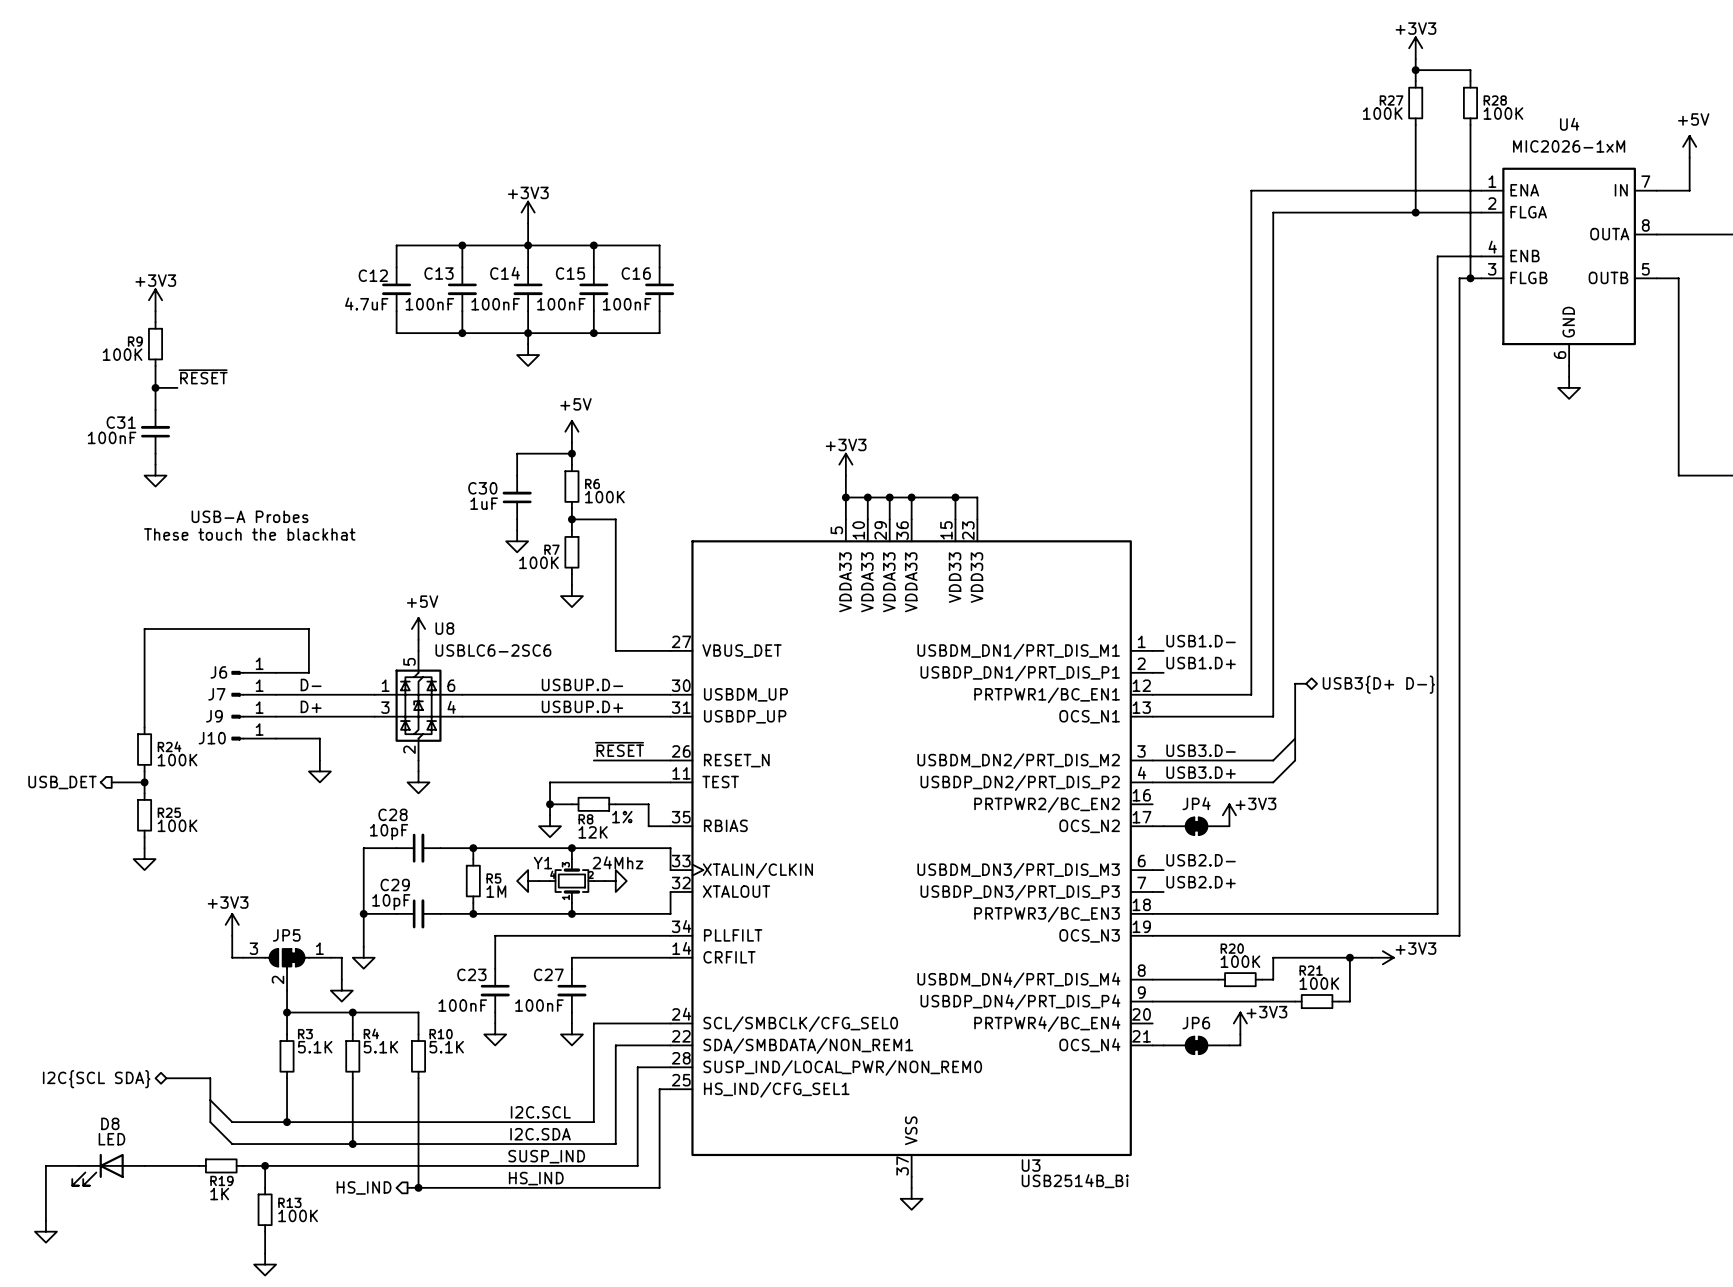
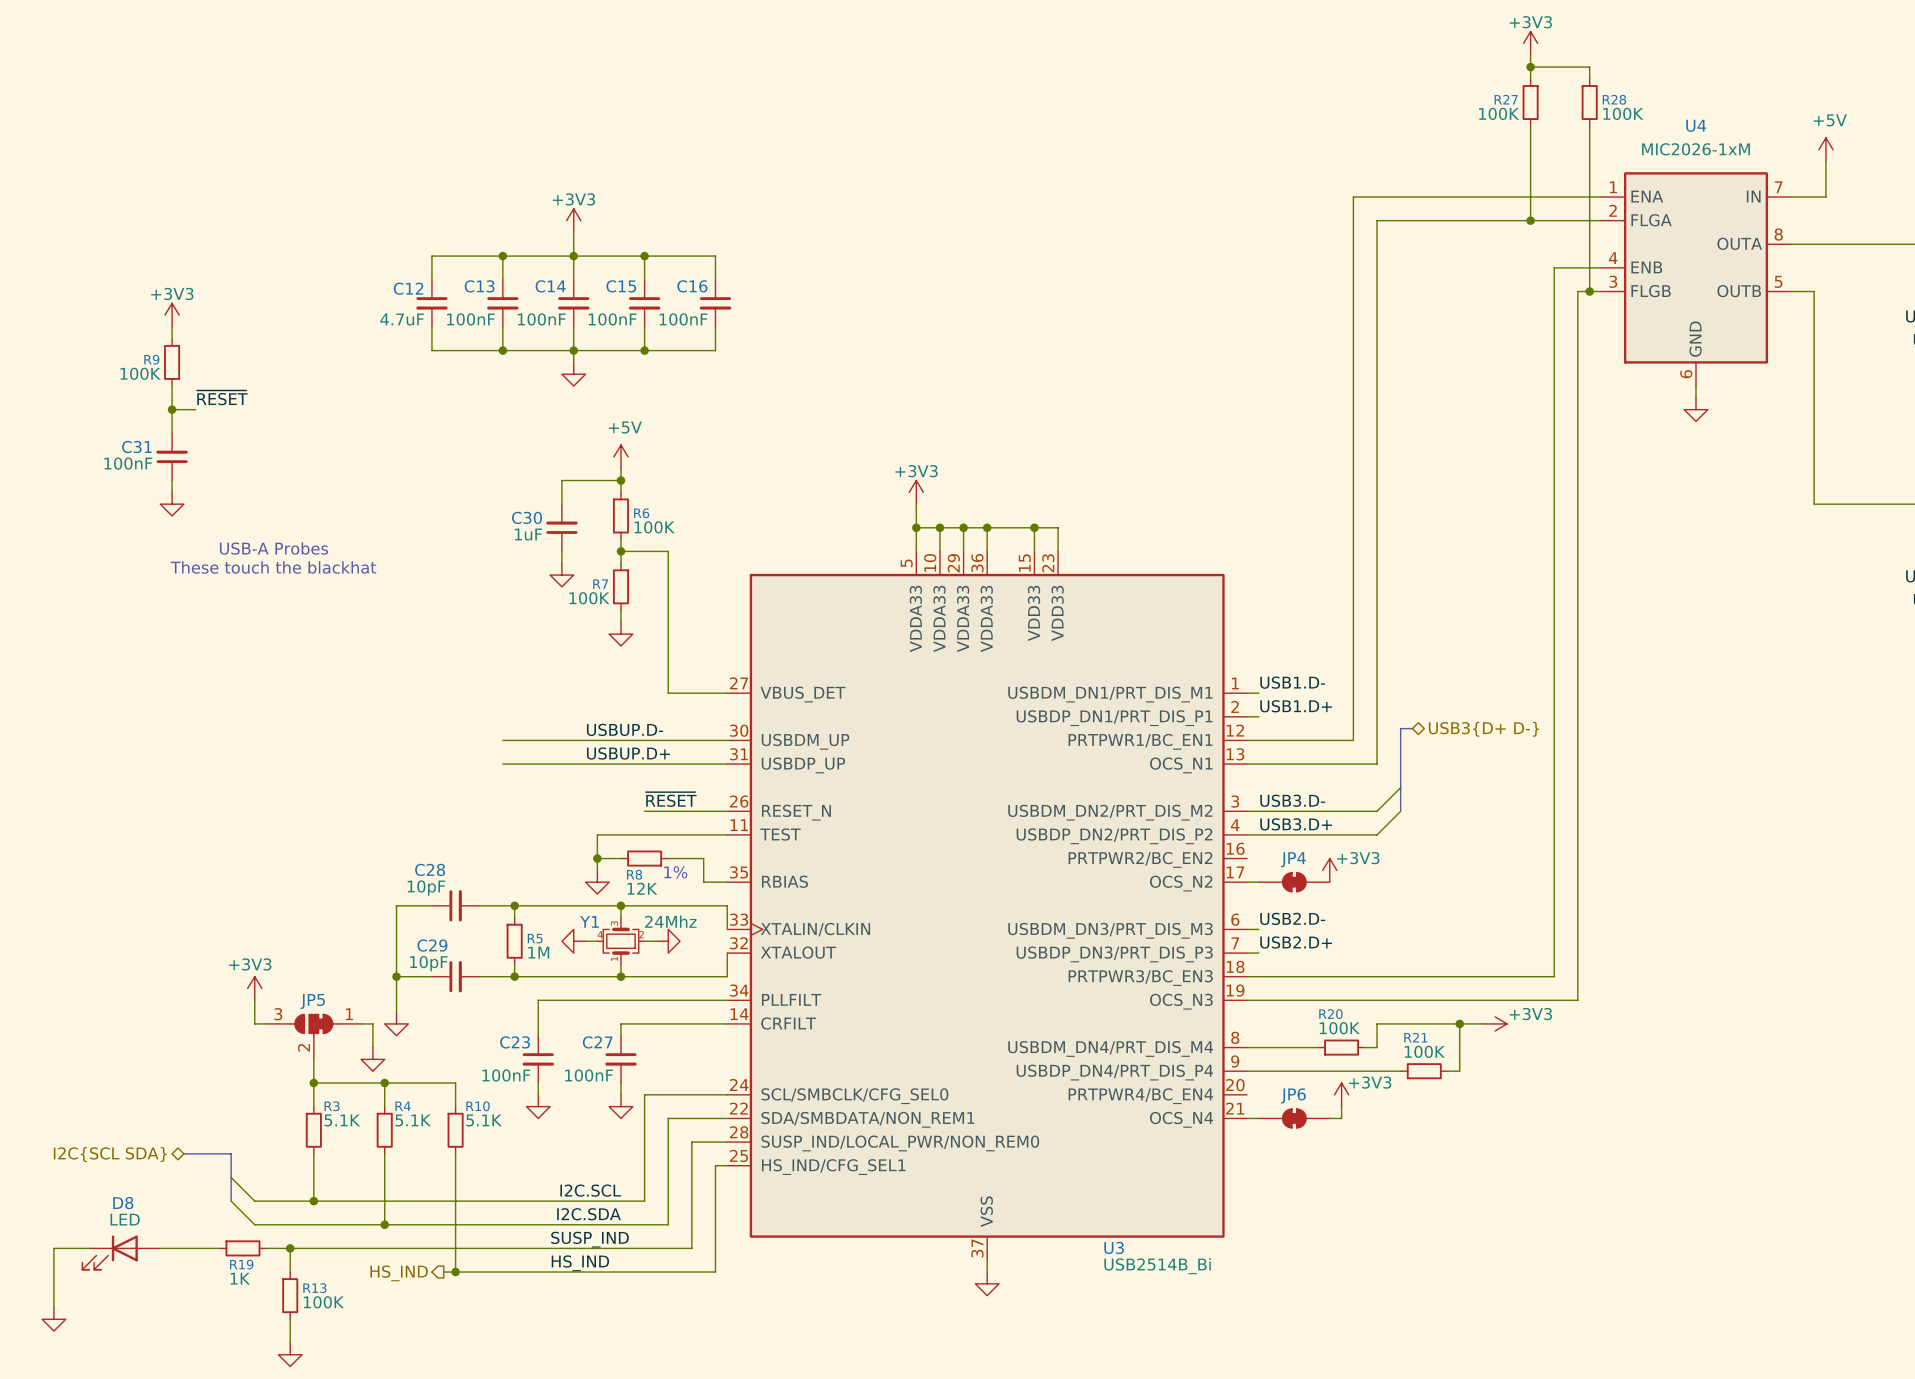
power symbol: +5V (418, 628) -> none
wire: (418, 639) (418, 650) -> none
J6: (253, 672) -> none
wire: (276, 672) (308, 672) (308, 628) (144, 628) (144, 727) -> none
label: D- (311, 684) -> none
J7: (253, 694) -> none
wire: (276, 694) (374, 694) -> none
U8: USBLC6-2SC6 (418, 705) -> none
label: D+ (311, 706) -> none
J9: (253, 716) -> none
wire: (276, 716) (374, 716) -> none
J10: (253, 738) -> none
wire: (276, 738) (319, 738) (319, 760) -> none
R24: 100K (144, 749) -> none
wire: (418, 760) (418, 771) -> none
wire: (144, 771) (144, 793) -> none
power symbol: (319, 771) -> none
hierarchical label: USB_DET (62, 782) -> none
wire: (111, 782) (144, 782) -> none
junction: (144, 782) -> none
power symbol: (418, 782) -> none
R25: 100K (144, 815) -> none
wire: (144, 837) (144, 848) -> none
power symbol: (144, 859) -> none

